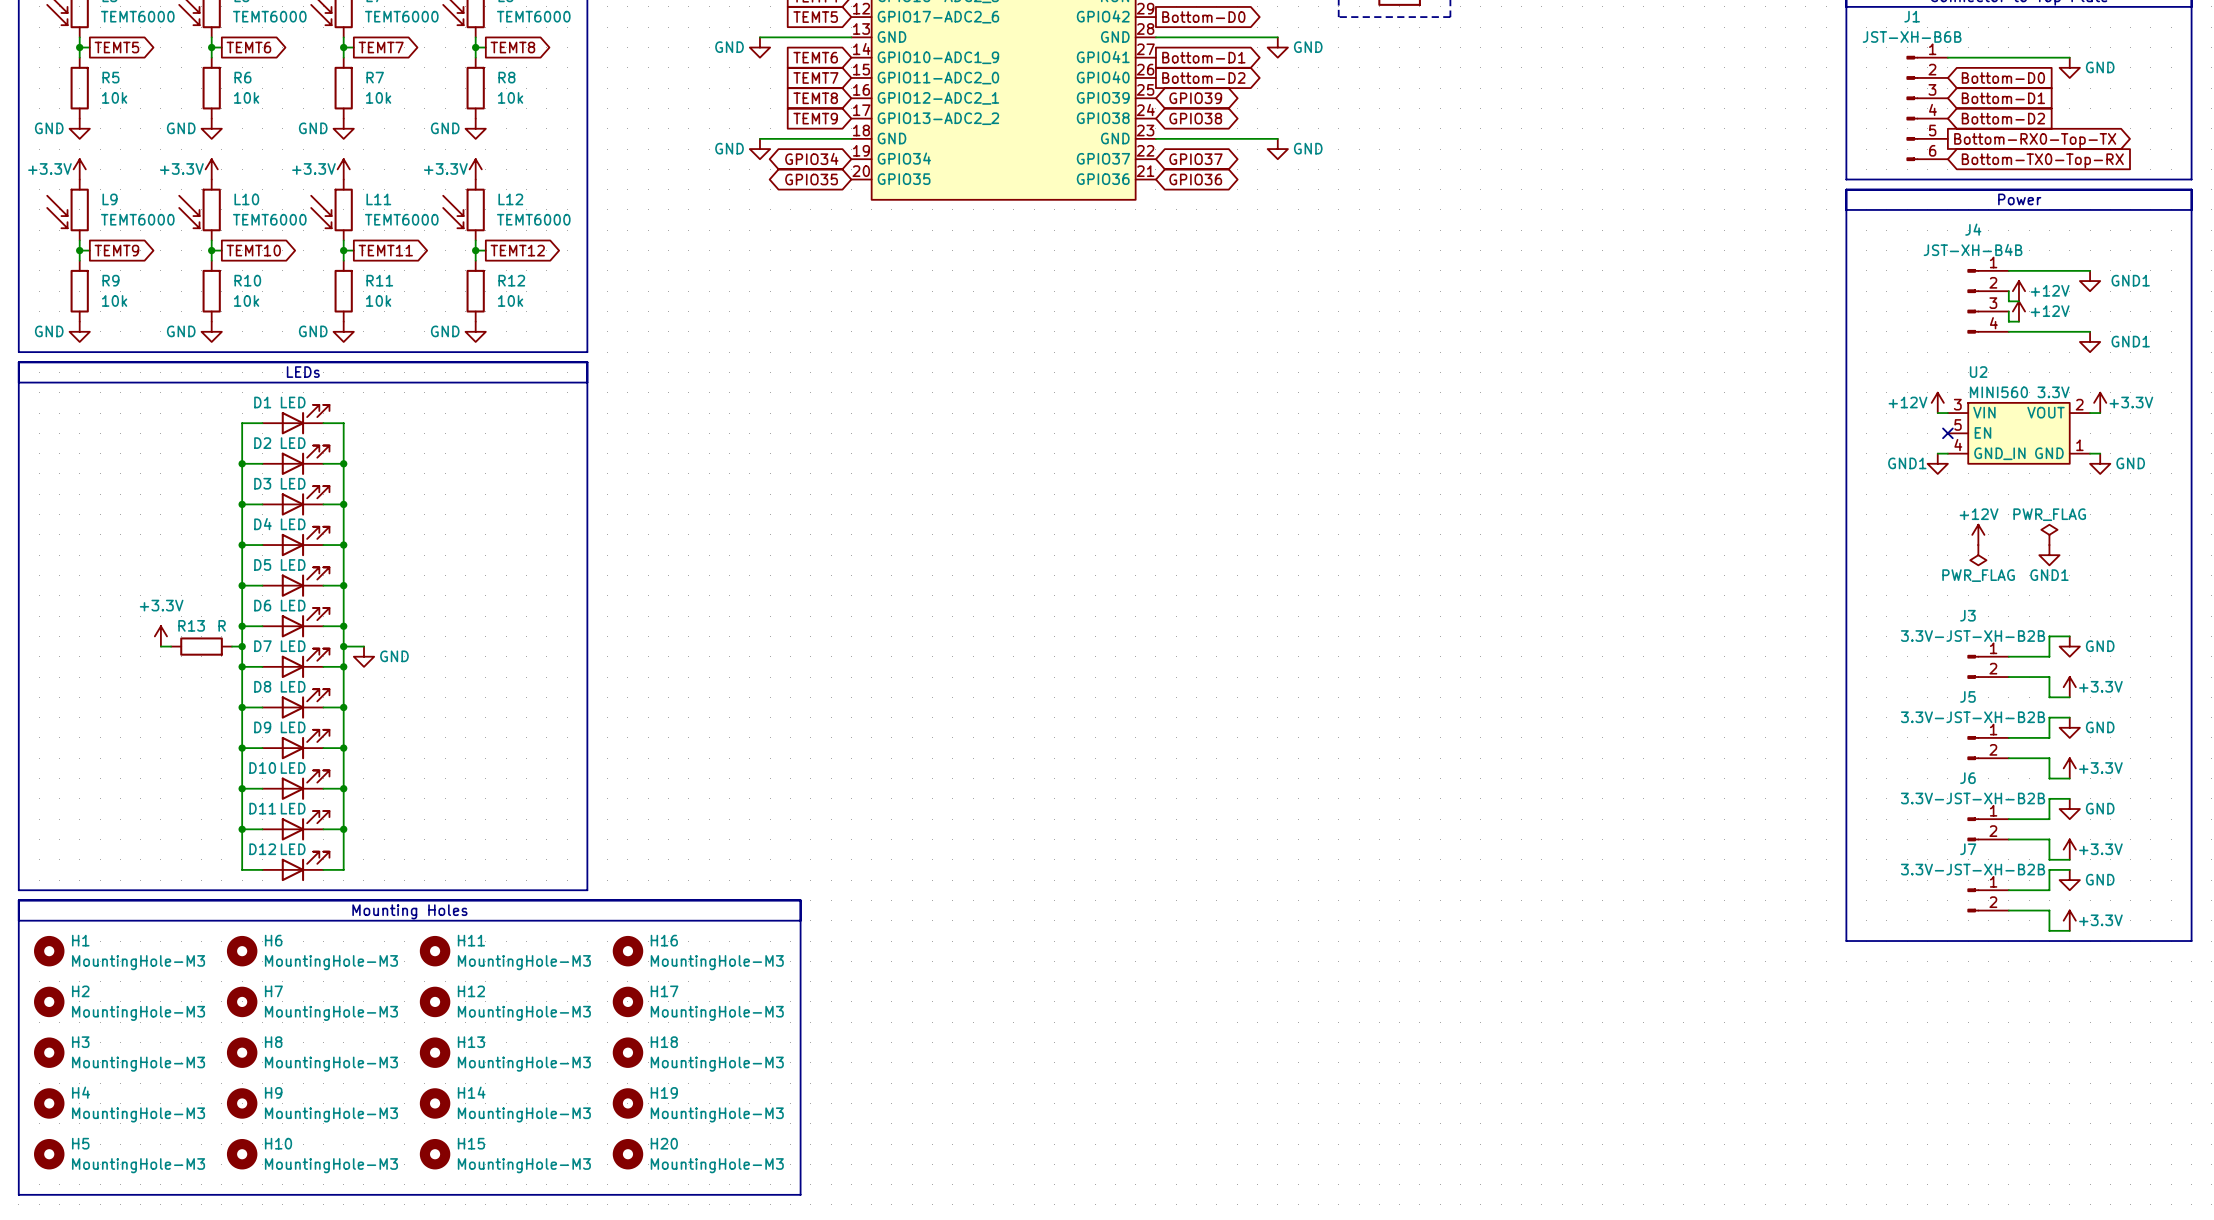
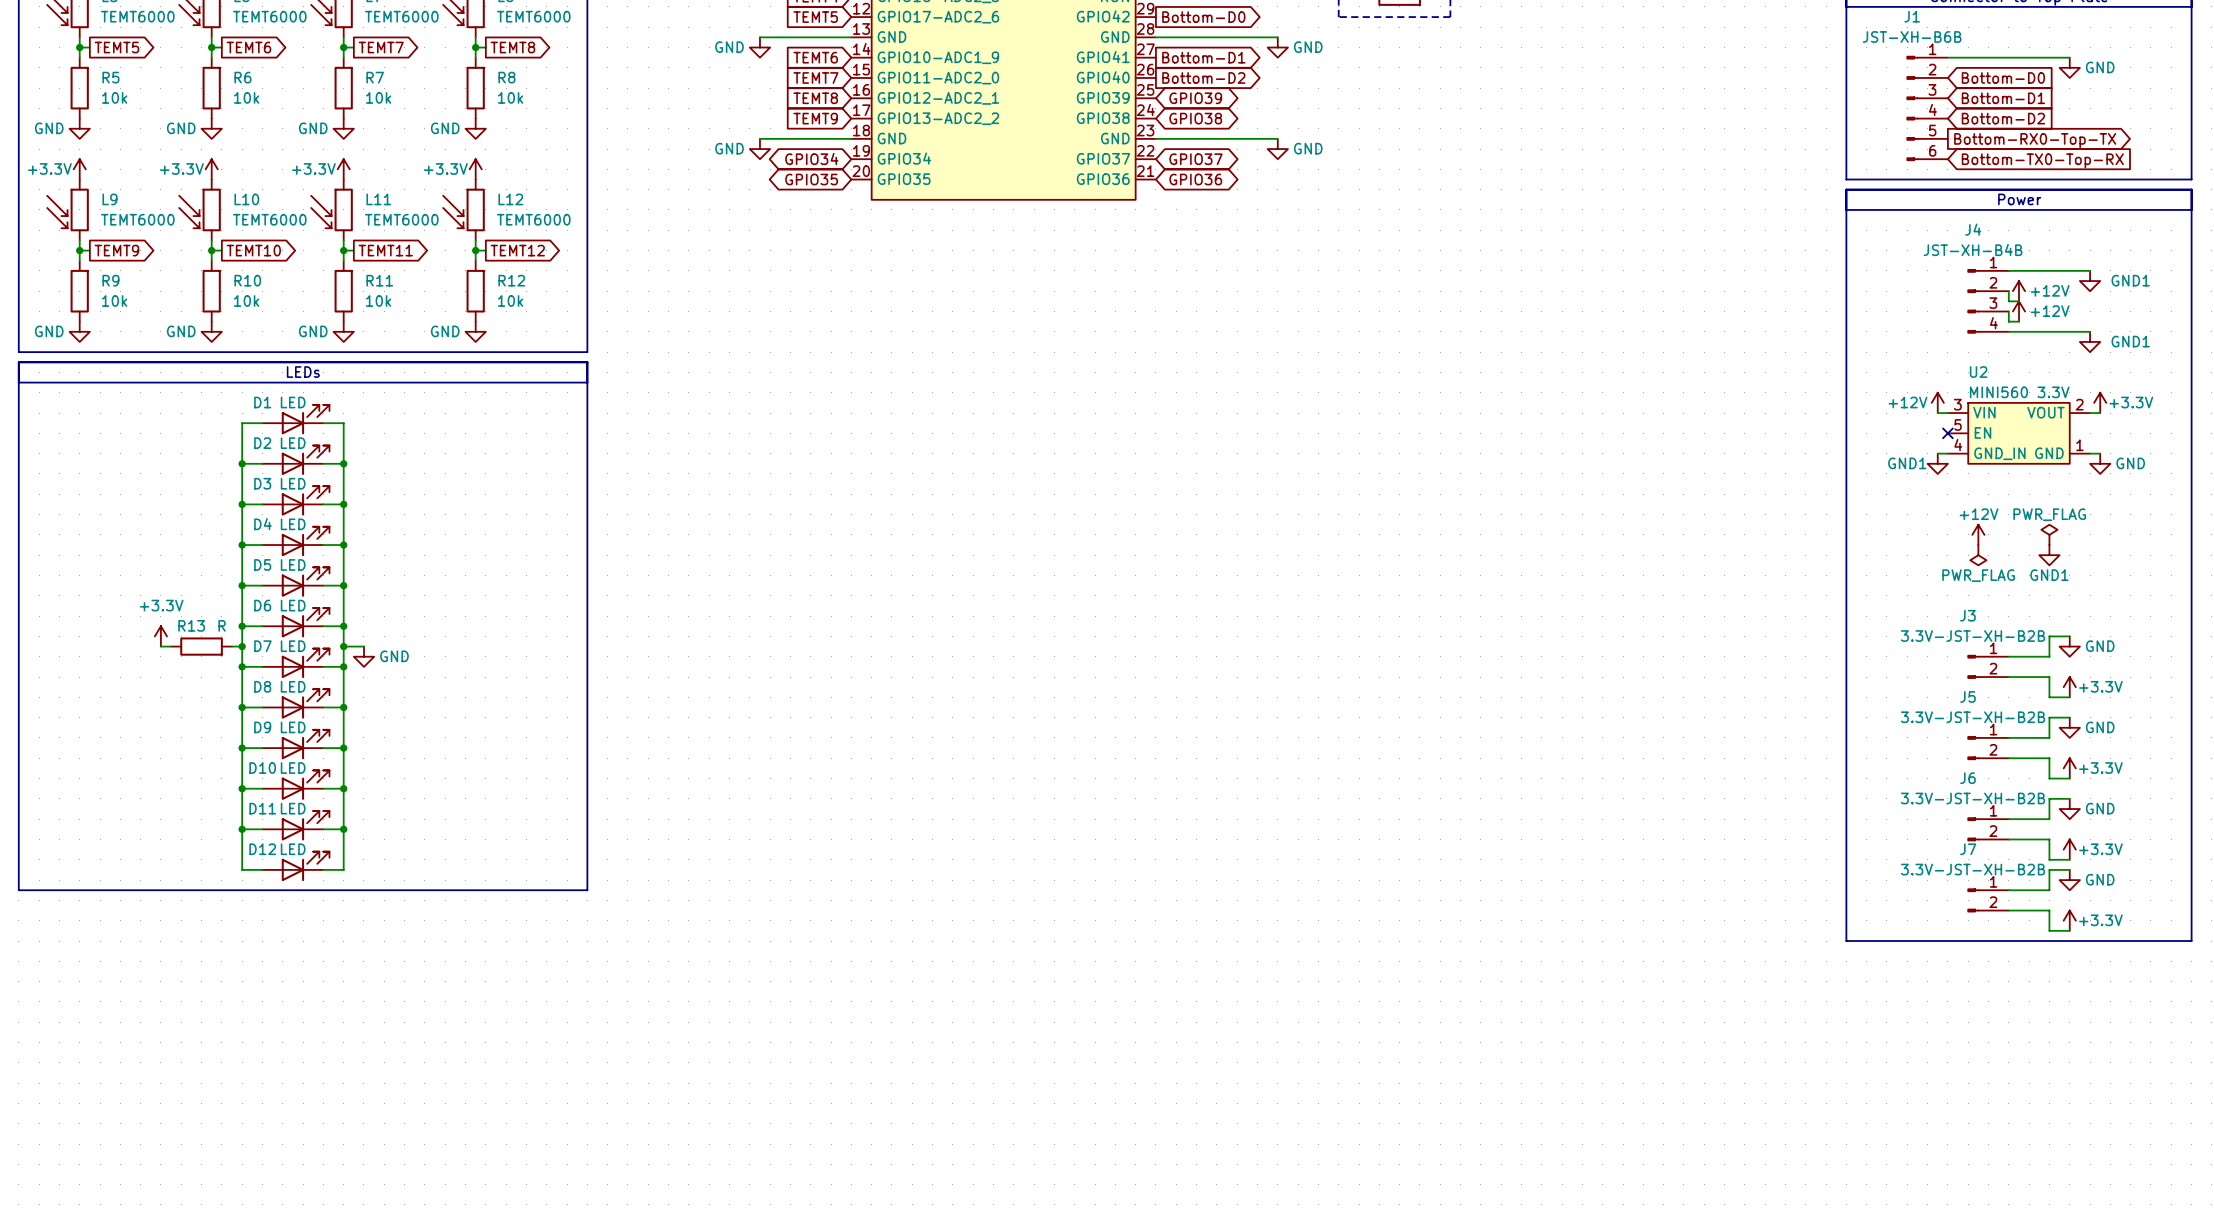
line: (18, 900) (800, 900) (800, 1194) (18, 1194) (18, 900) -> none
text: Mounting Holes (409, 911) -> none
line: (18, 920) (800, 920) -> none
H1: MountingHole-M3 (49, 951) -> none
H6: MountingHole-M3 (242, 951) -> none
H11: MountingHole-M3 (435, 951) -> none
H16: MountingHole-M3 (627, 951) -> none
H2: MountingHole-M3 (49, 1001) -> none
H7: MountingHole-M3 (242, 1001) -> none
H12: MountingHole-M3 (435, 1001) -> none
H17: MountingHole-M3 (627, 1001) -> none
H3: MountingHole-M3 (49, 1052) -> none
H8: MountingHole-M3 (242, 1052) -> none
H13: MountingHole-M3 (435, 1052) -> none
H18: MountingHole-M3 (627, 1052) -> none
H4: MountingHole-M3 (49, 1103) -> none
H9: MountingHole-M3 (242, 1103) -> none
H14: MountingHole-M3 (435, 1103) -> none
H19: MountingHole-M3 (627, 1103) -> none
H5: MountingHole-M3 (49, 1154) -> none
H10: MountingHole-M3 (242, 1154) -> none
H15: MountingHole-M3 (435, 1154) -> none
H20: MountingHole-M3 (627, 1154) -> none

